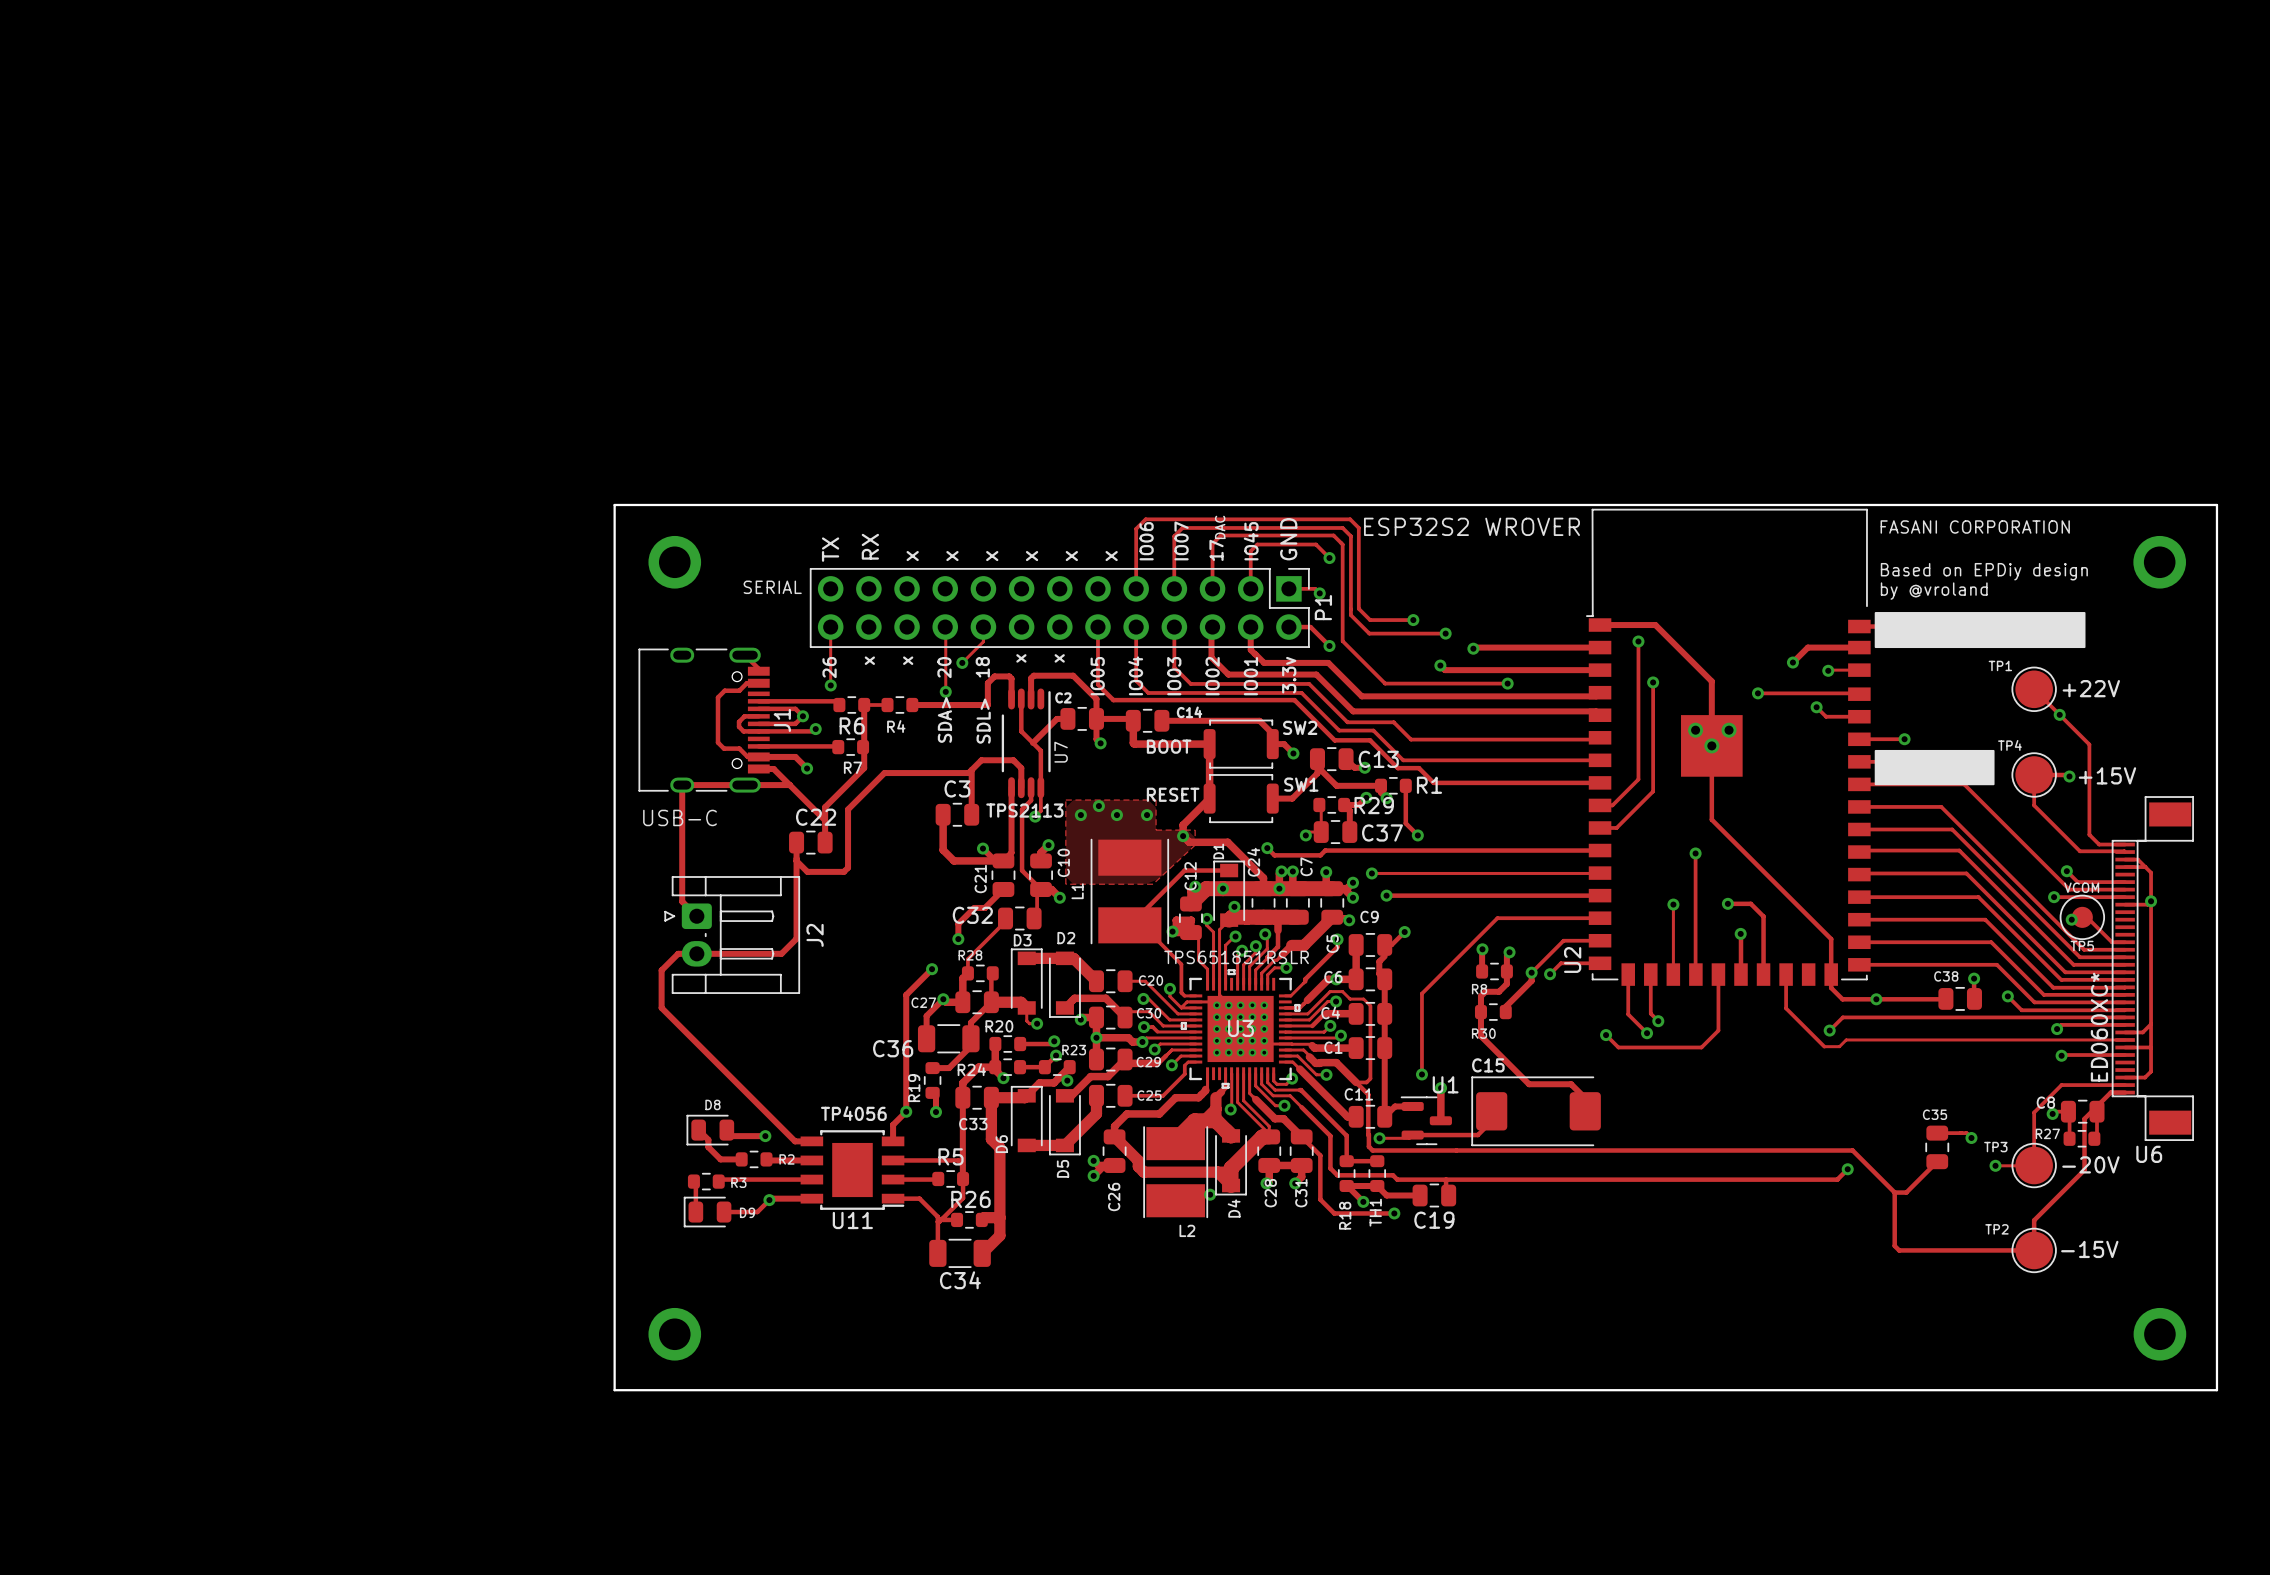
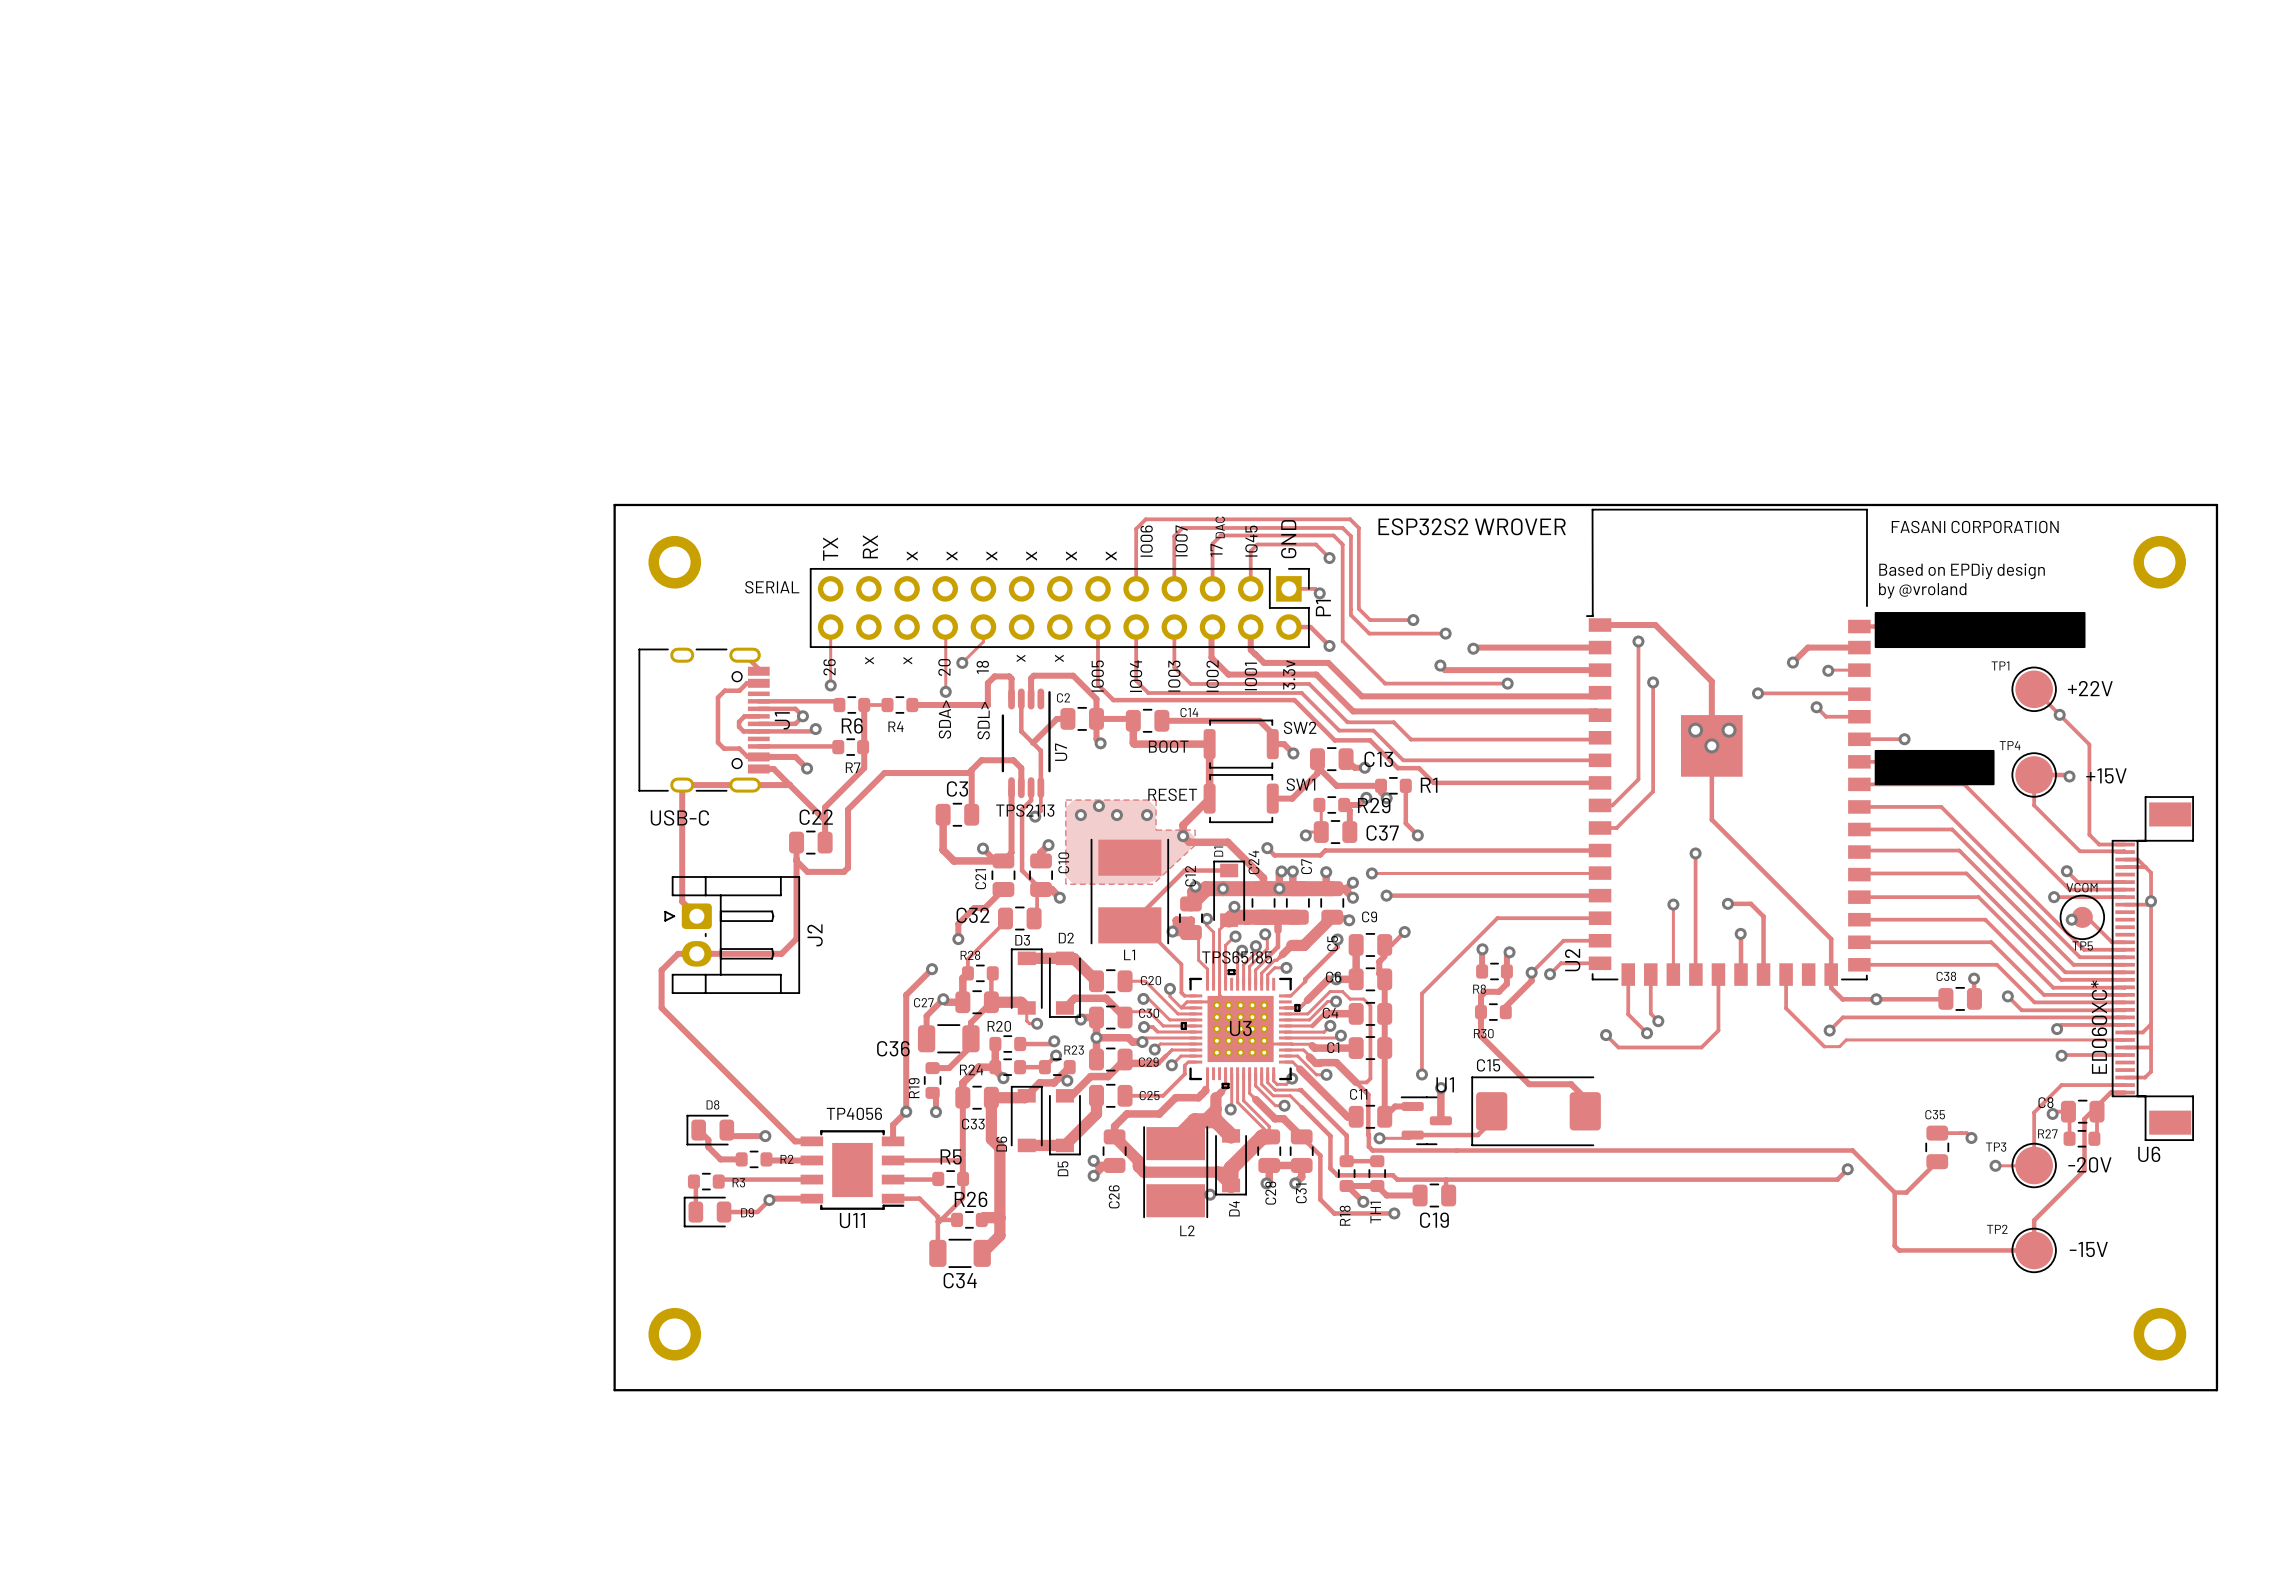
L1 name rotation: 0° (1077, 891) -> 90° clockwise (1129, 954)
L1 name position: L1 (1077, 891) -> L1 (1129, 954)
U3 value: TPS651851RSLR (1236, 957) -> TPS65185 (1237, 957)

